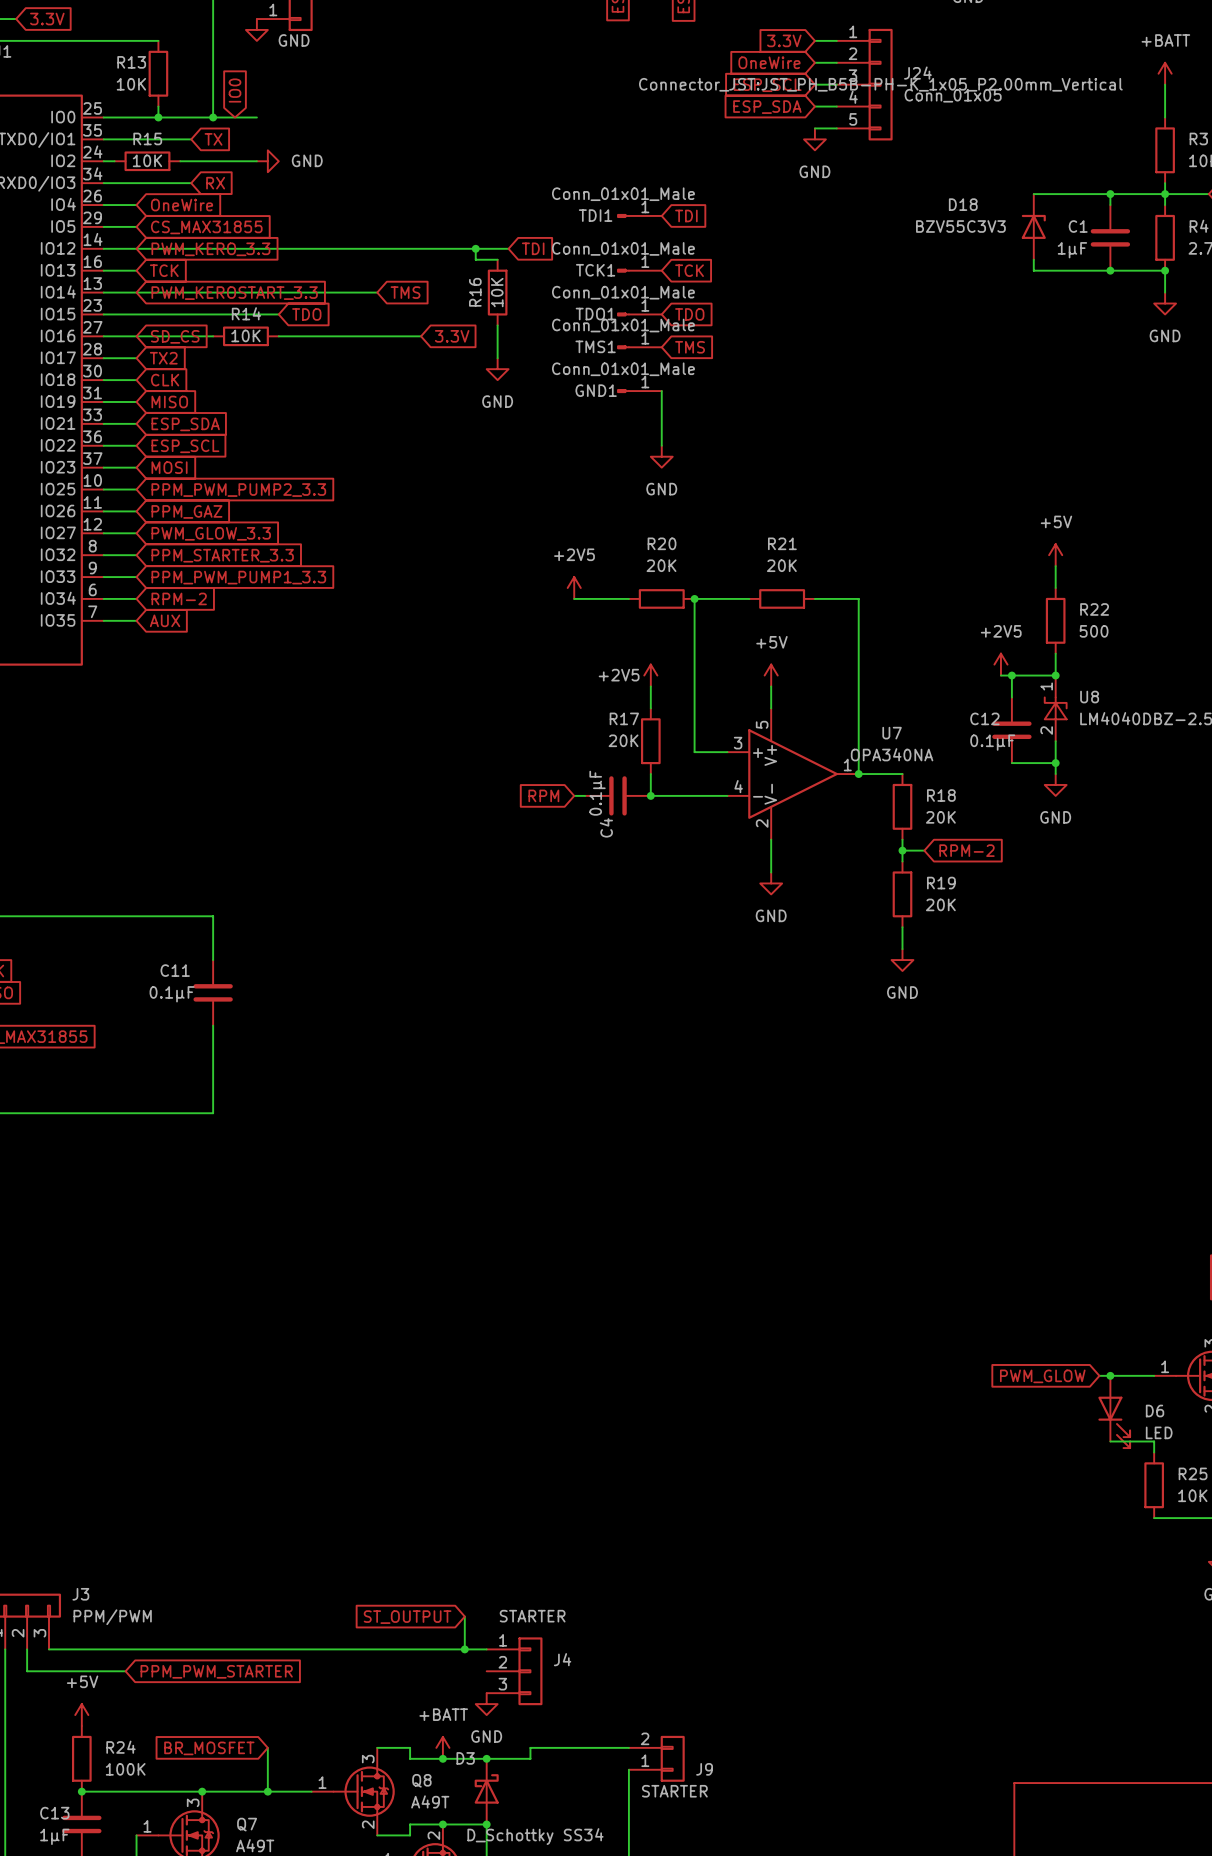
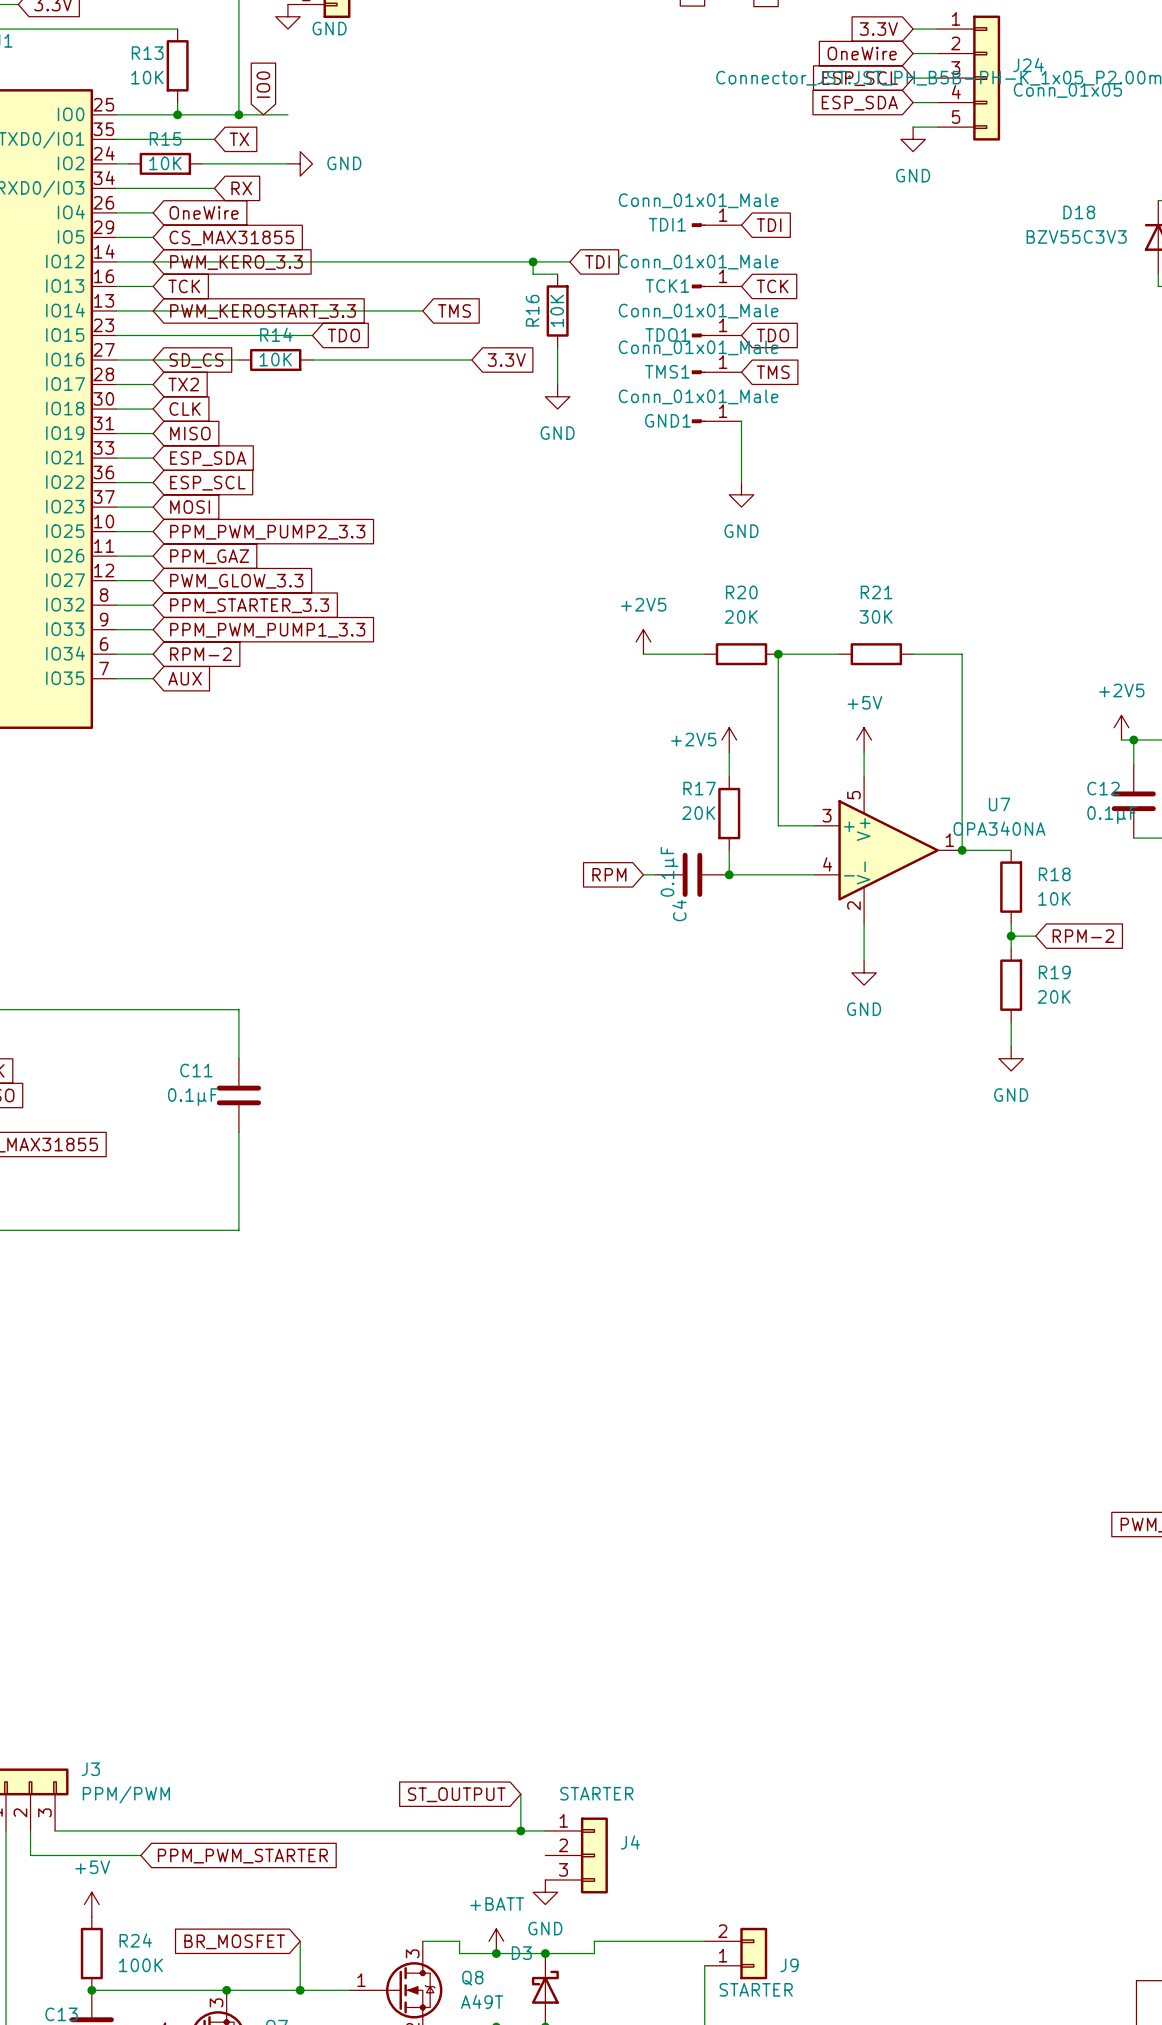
R21 value: 20K (781, 565) -> 30K (876, 616)
R18 value: 20K (940, 817) -> 10K (1054, 898)

